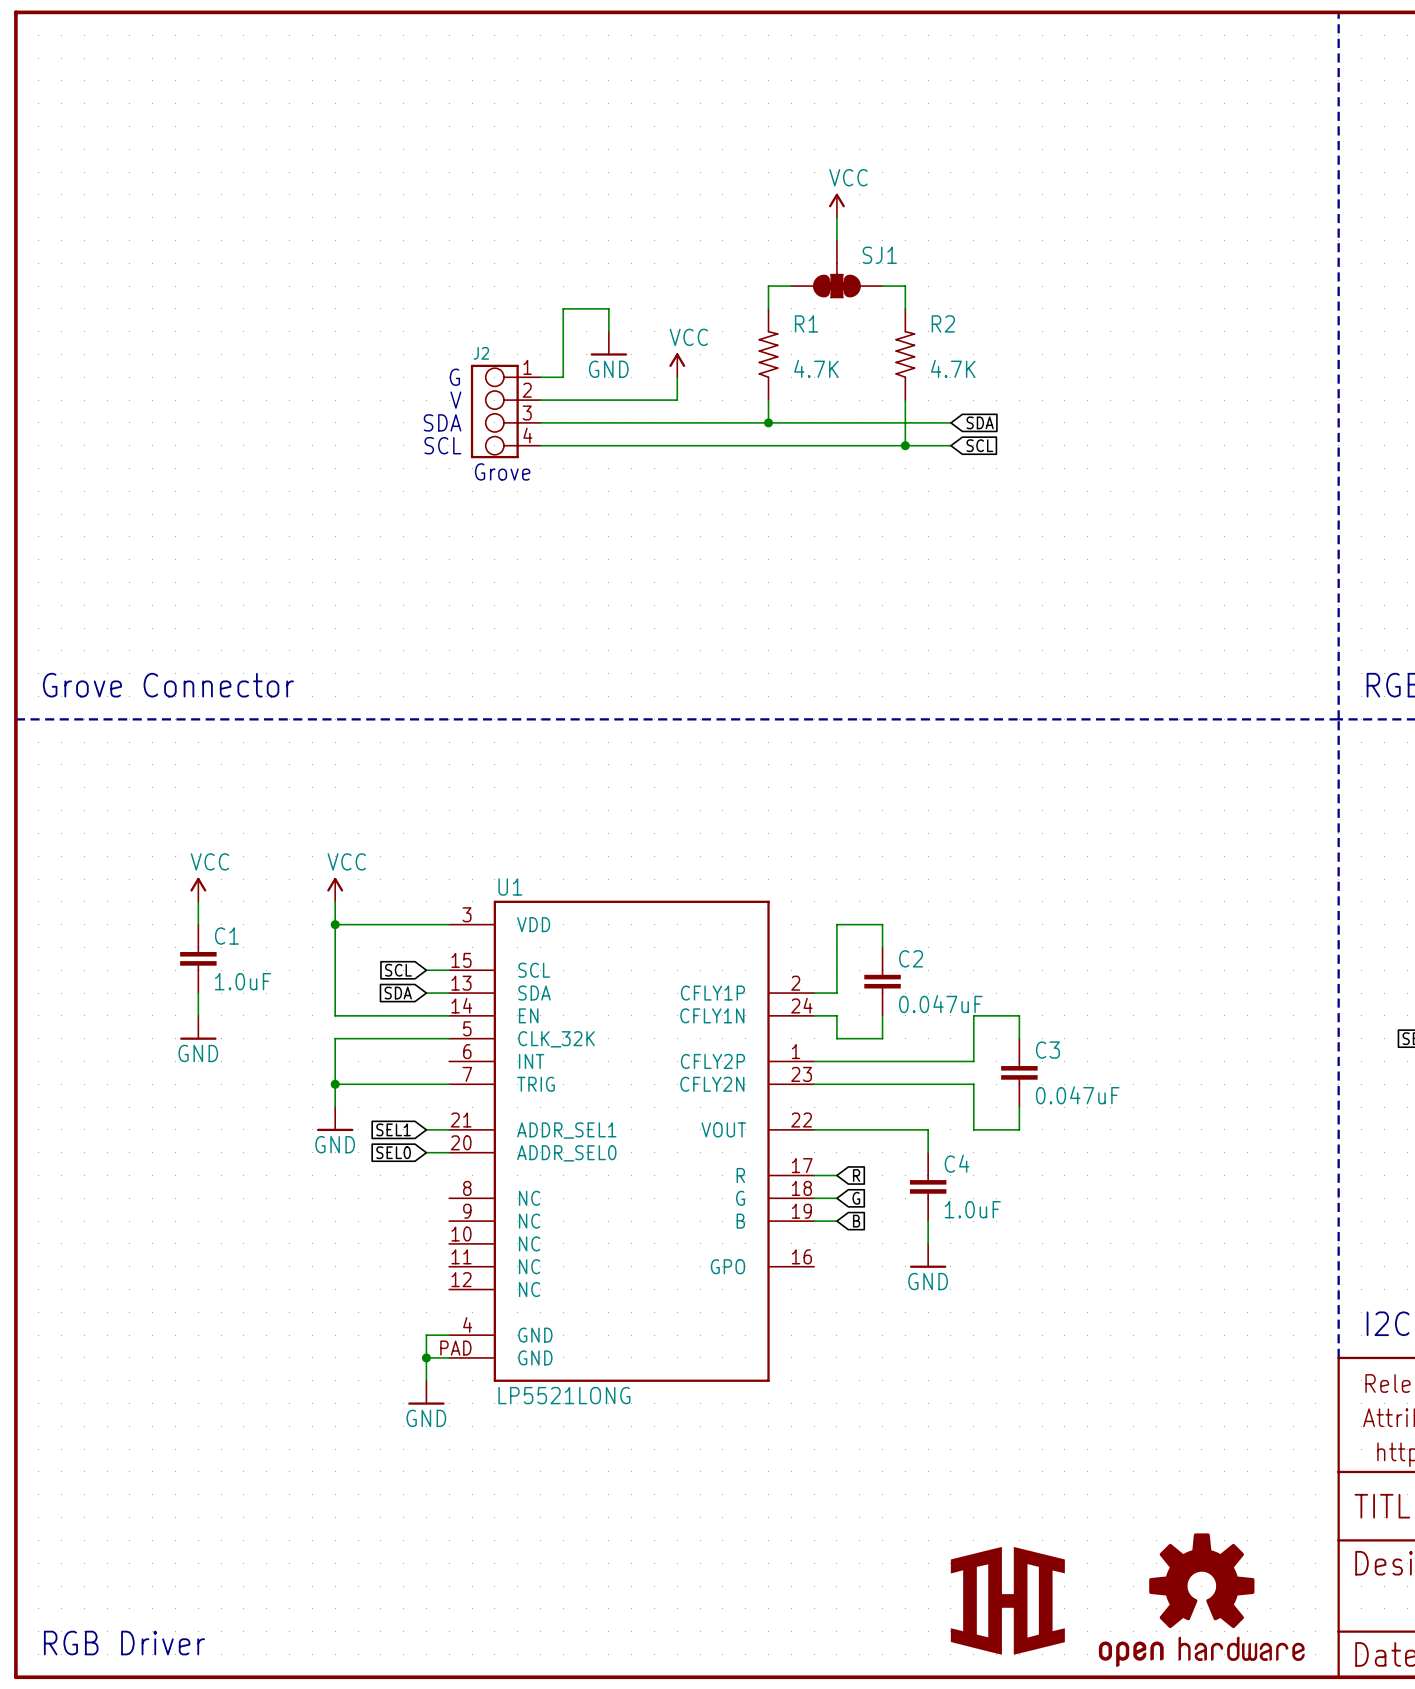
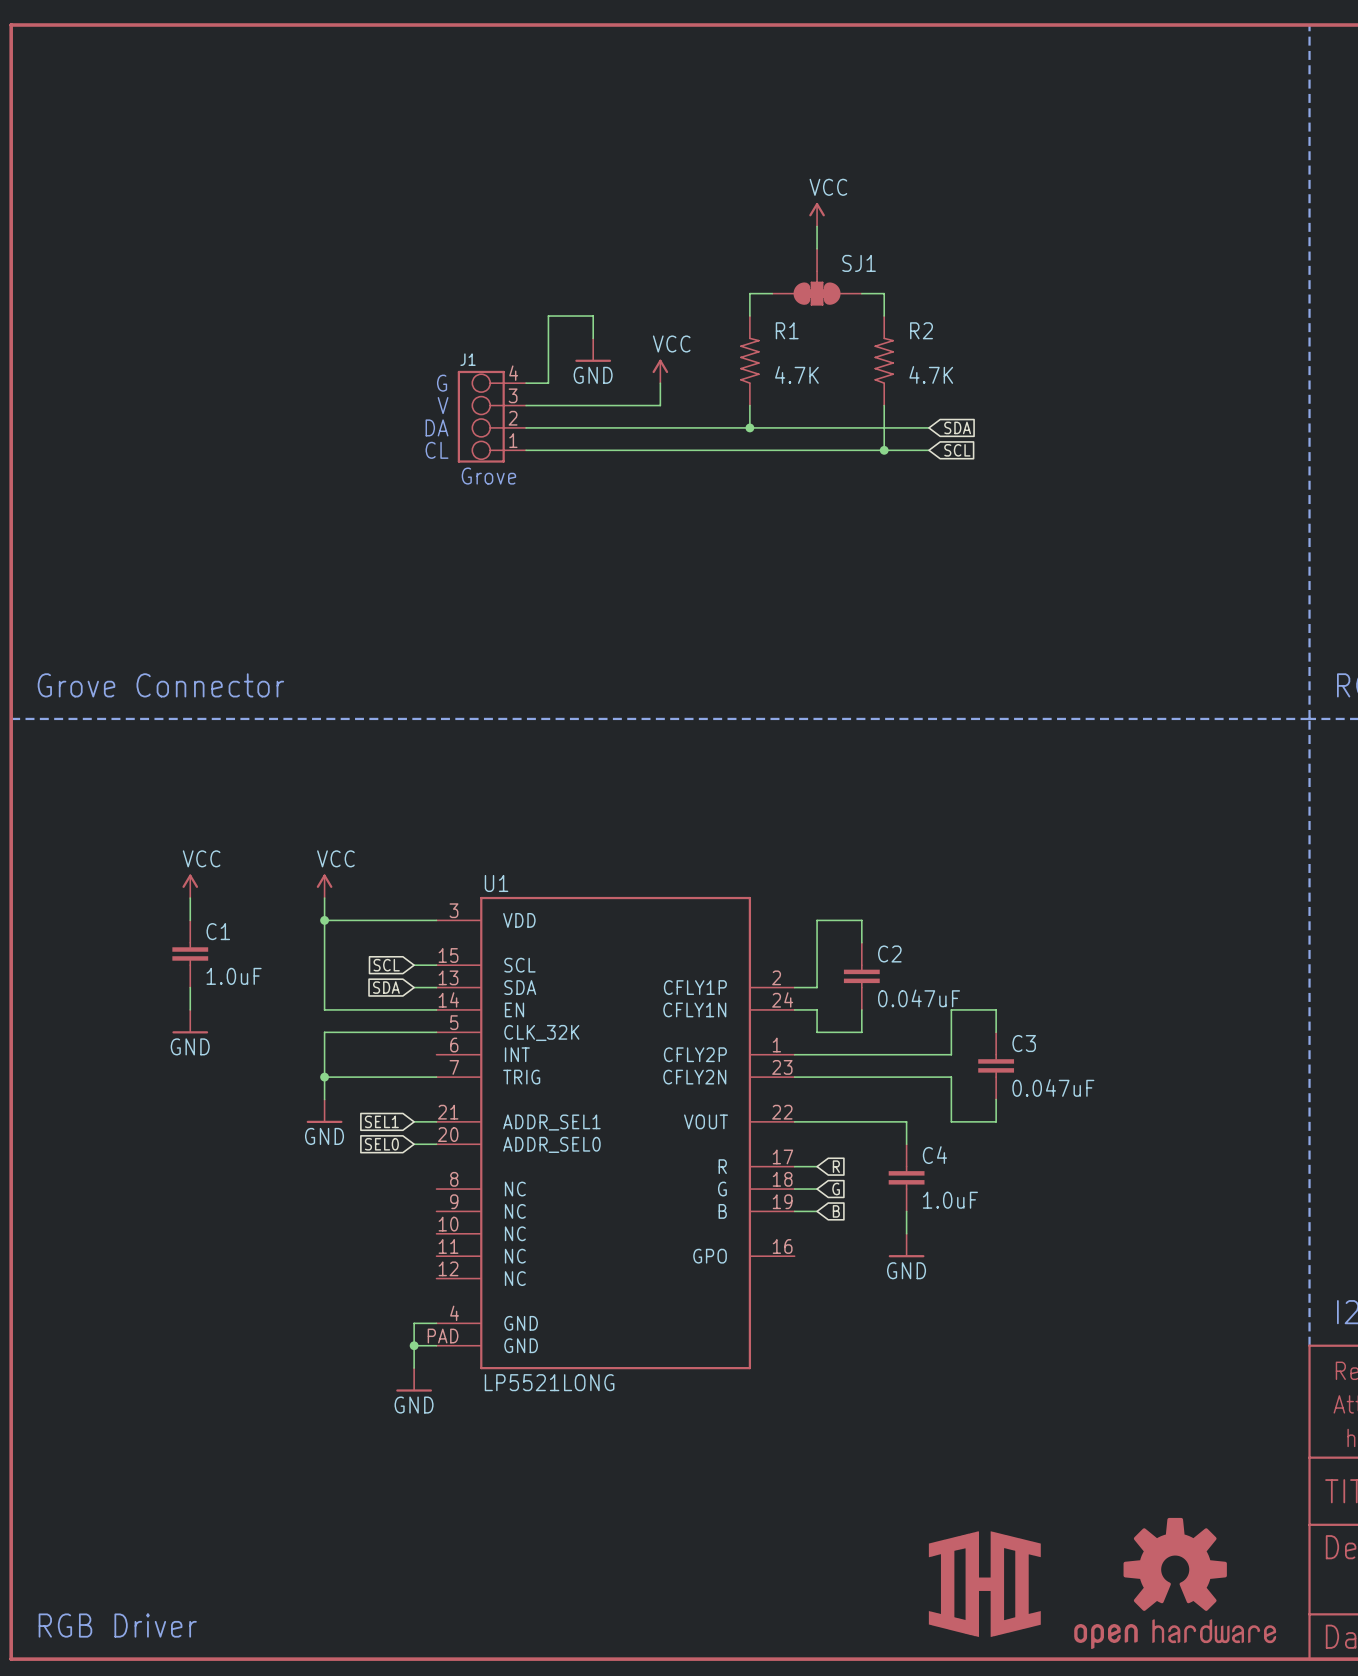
J2 name: J2 (481, 353) -> J1 (468, 359)
J2 flip: as is (494, 411) -> up-down (481, 416)
text: SDA (442, 422) -> DA (437, 427)
text: SCL (442, 445) -> CL (437, 450)

